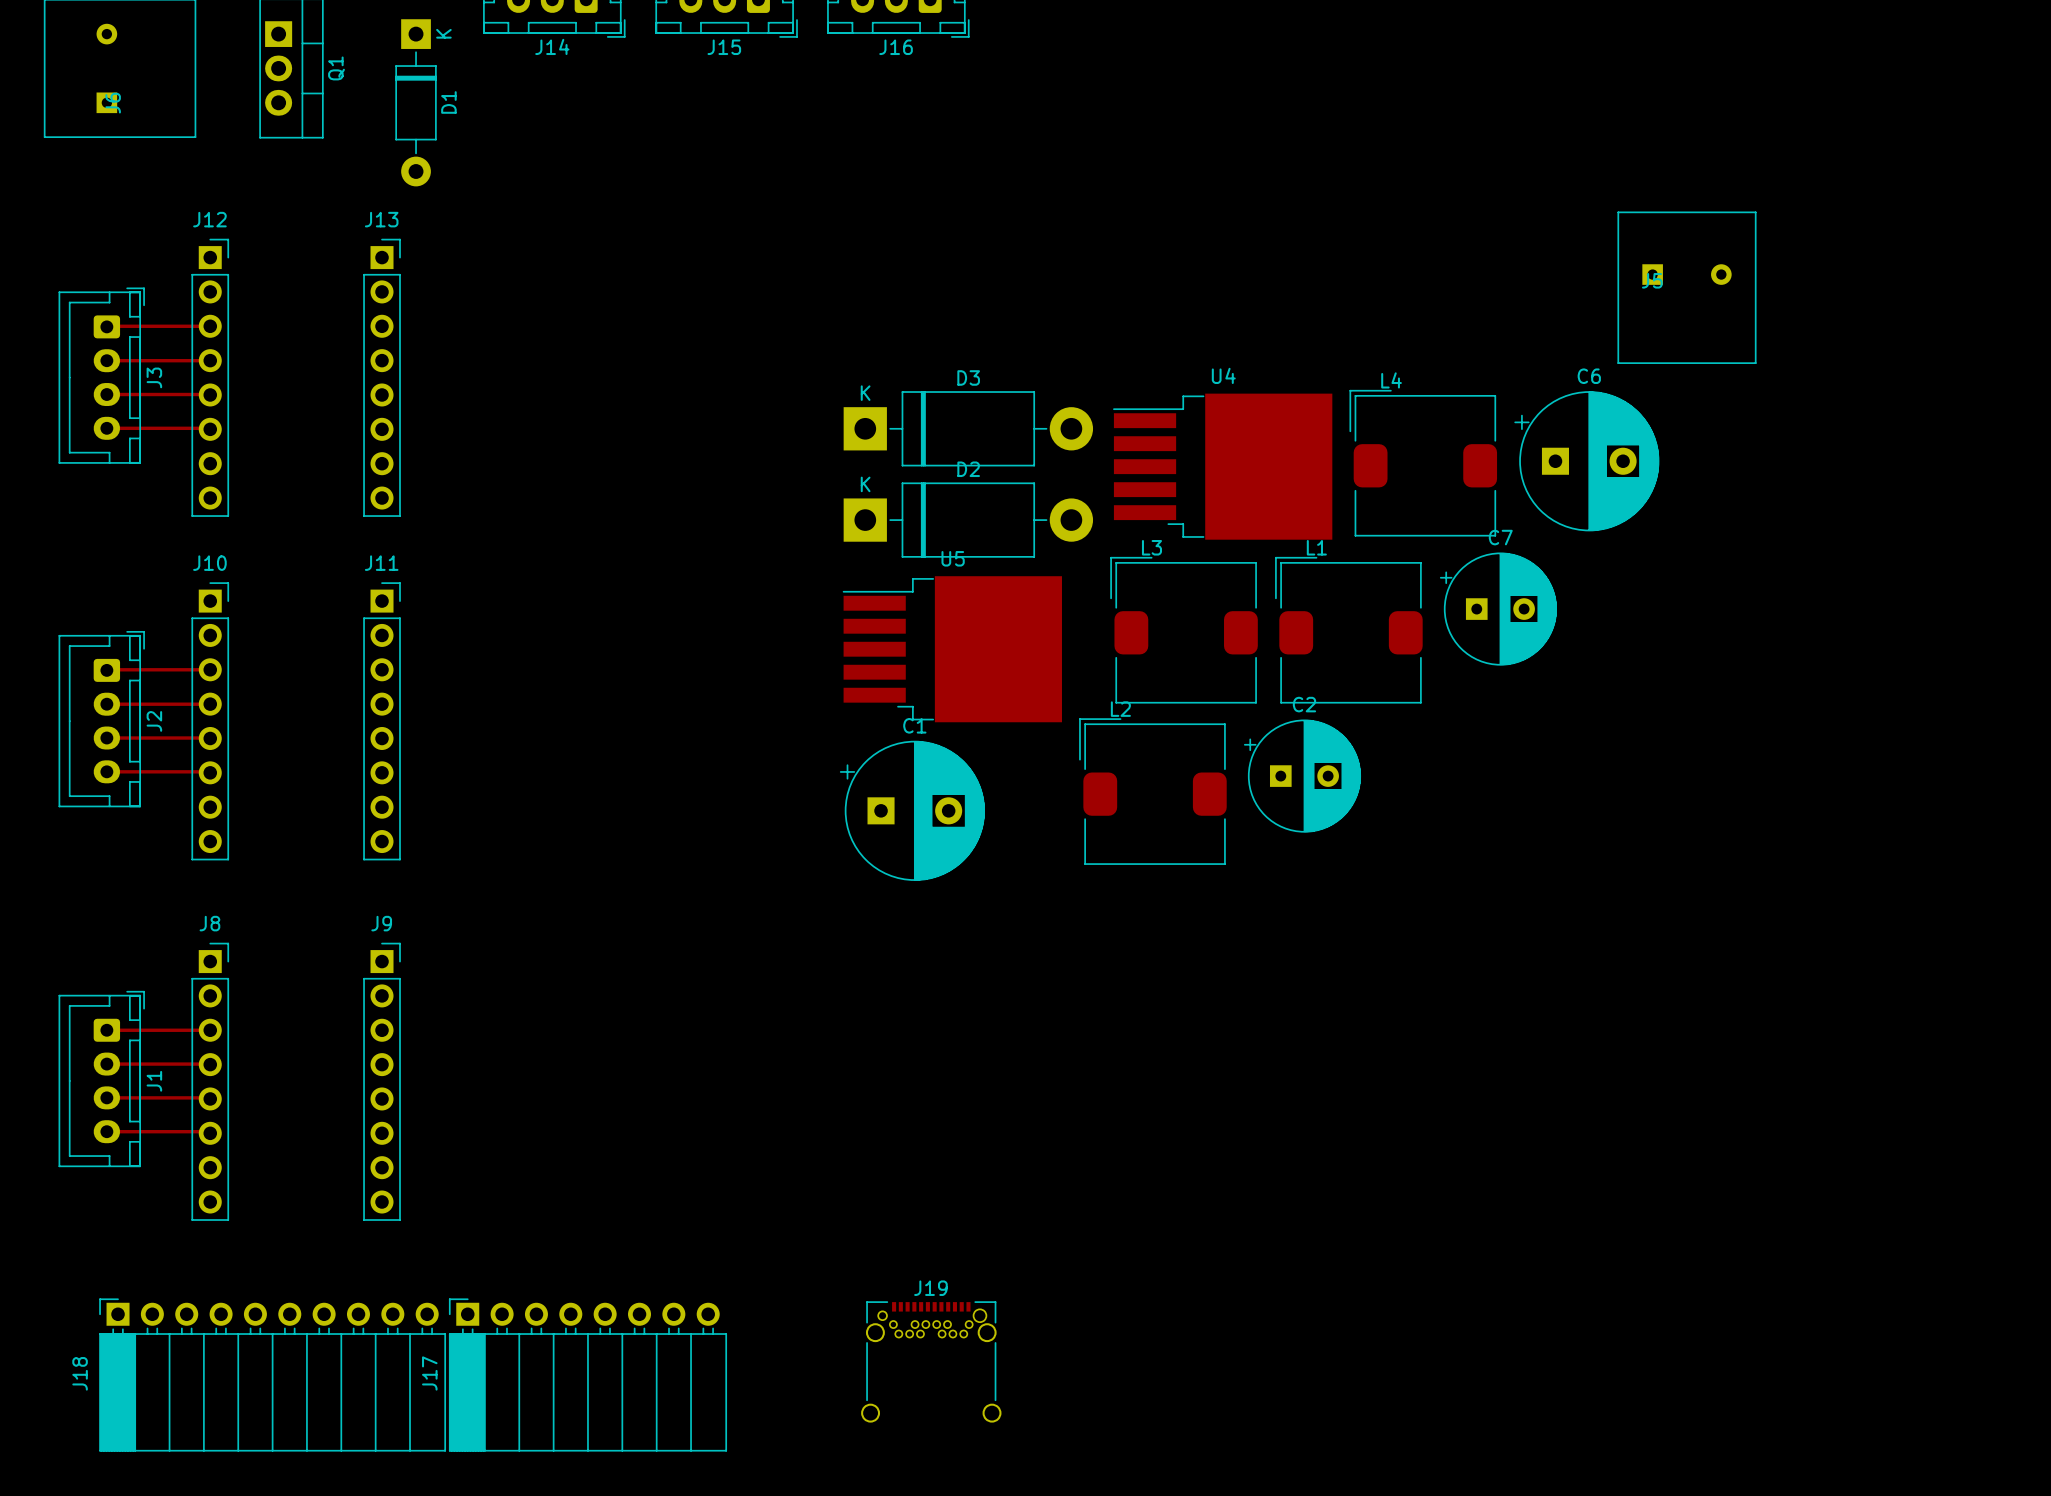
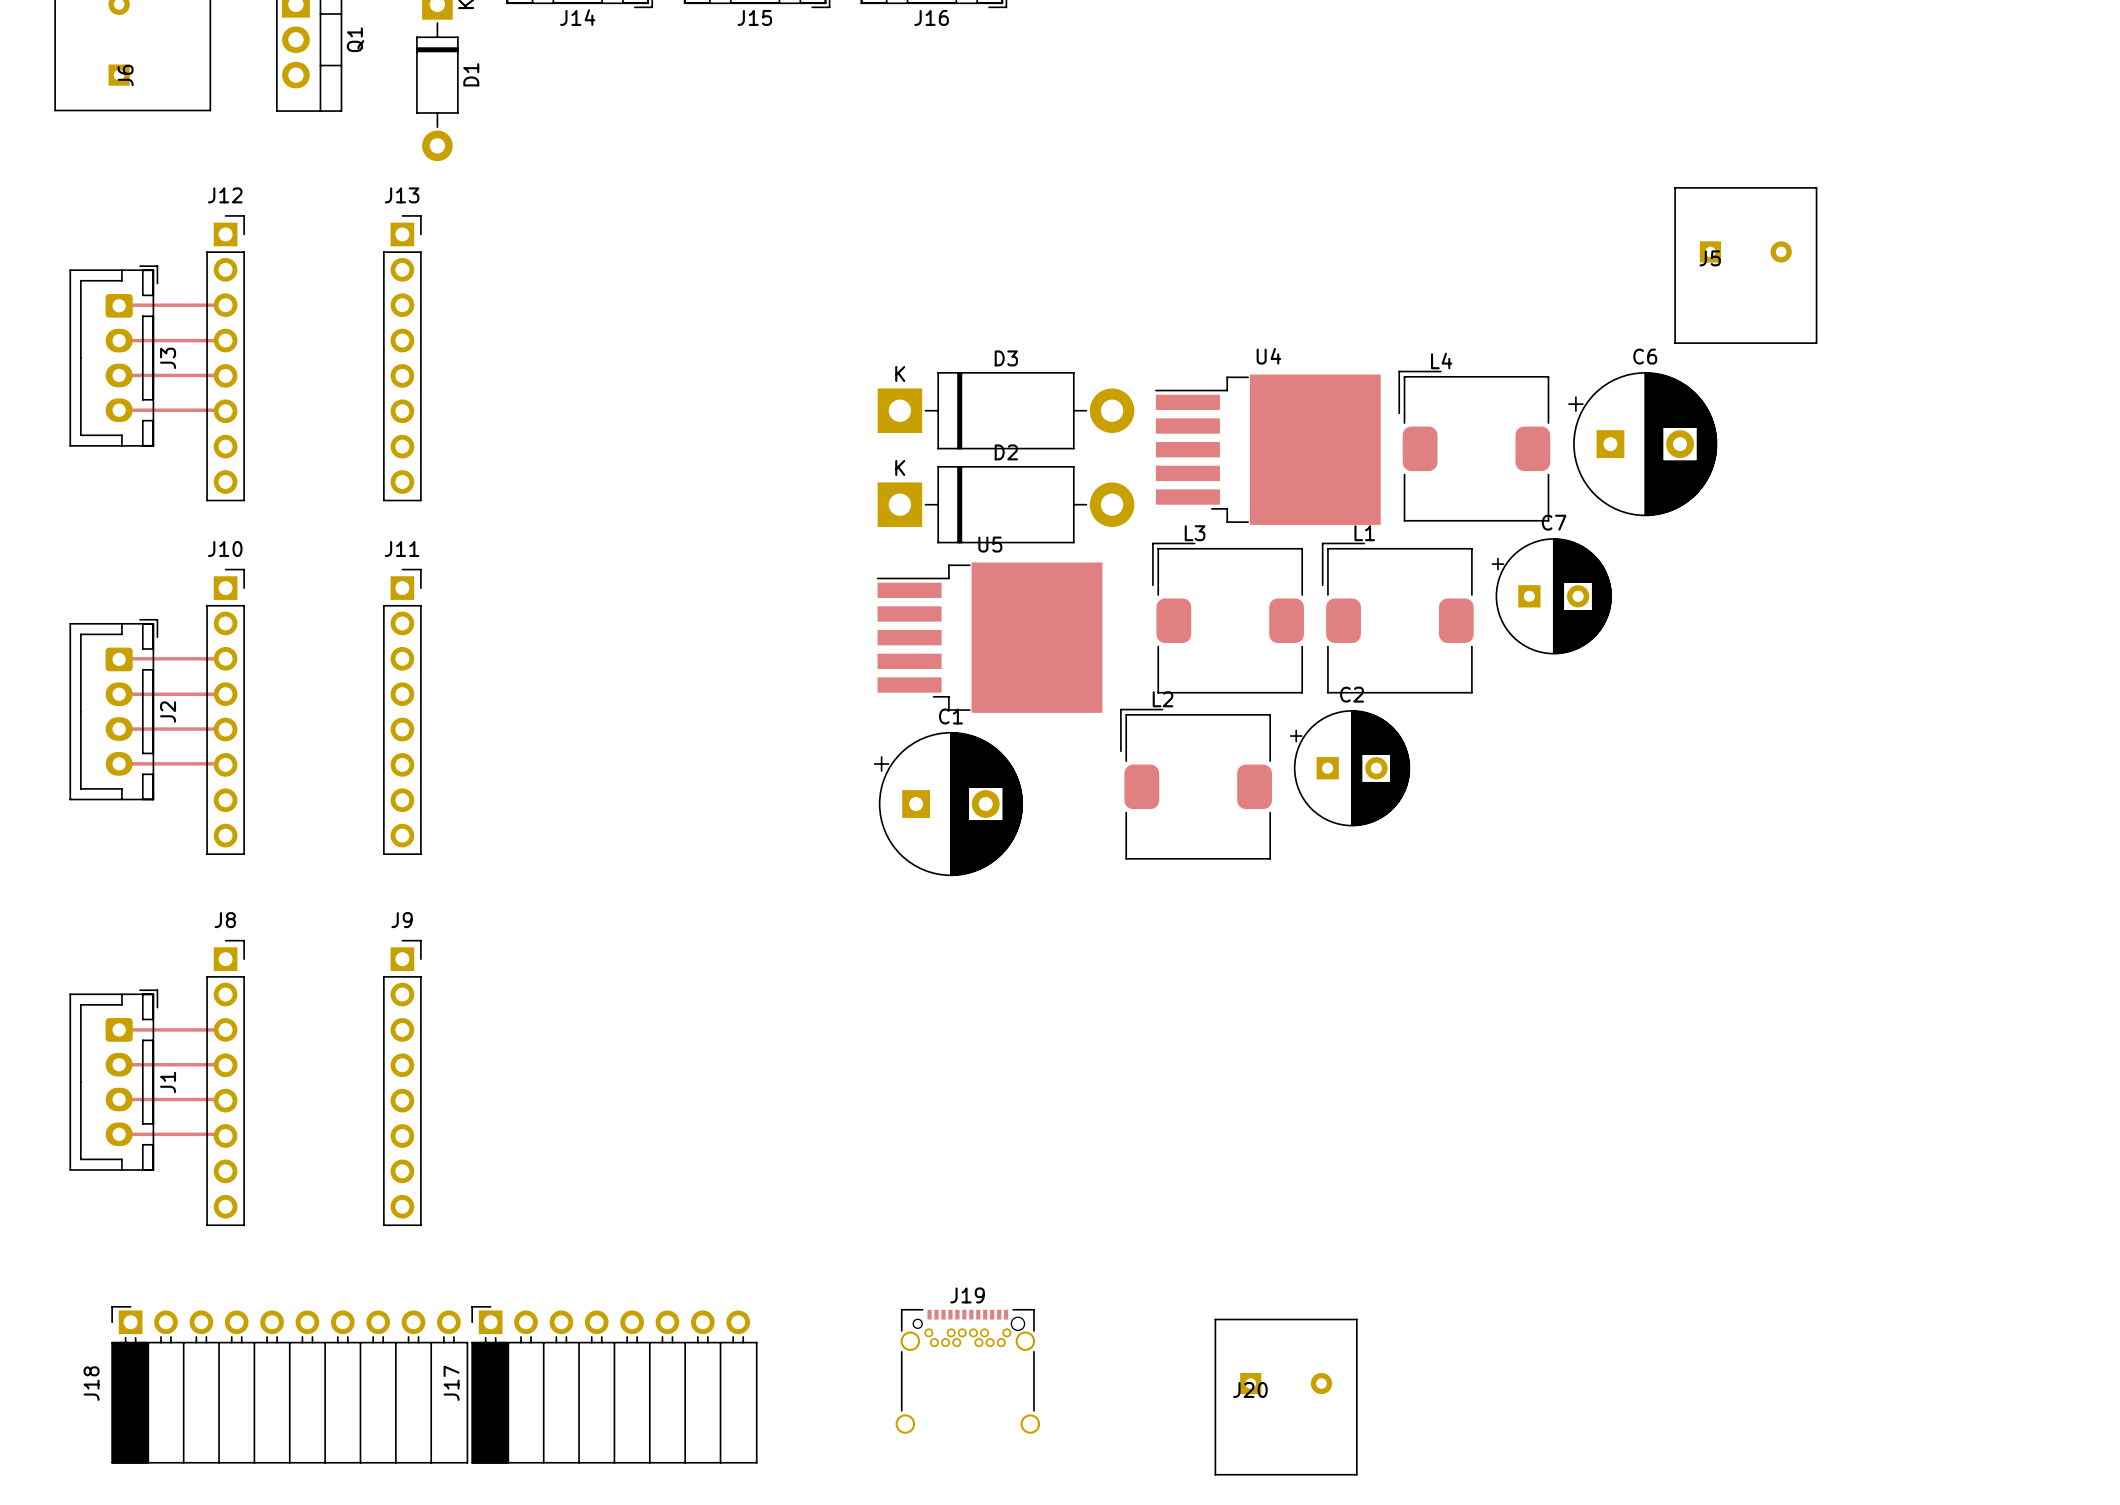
J20: none -> (1286, 1397)

